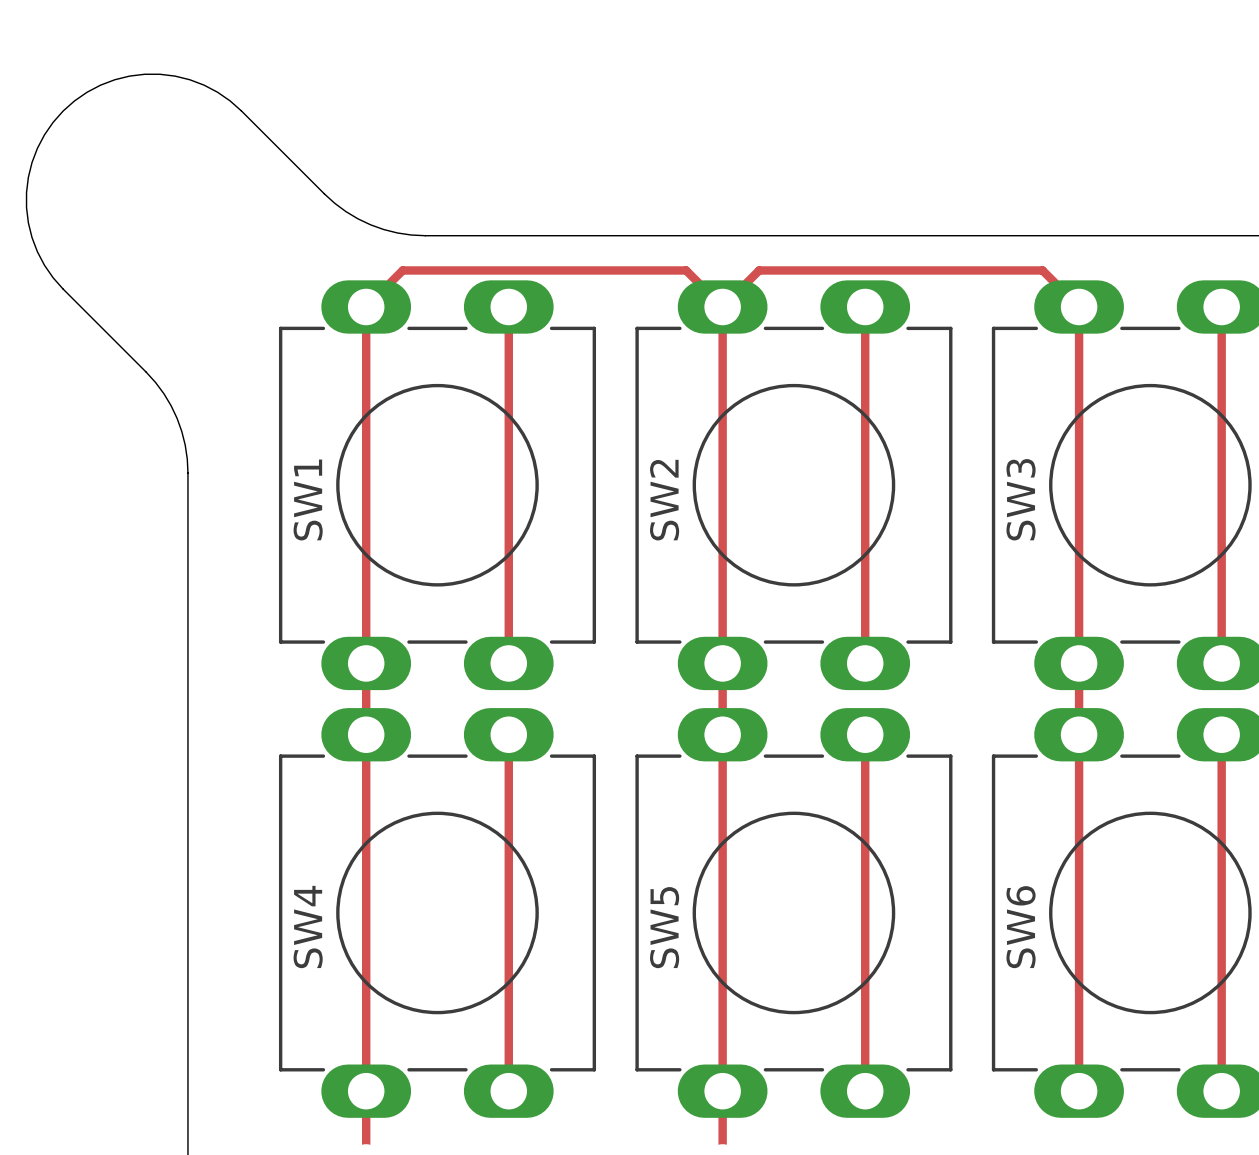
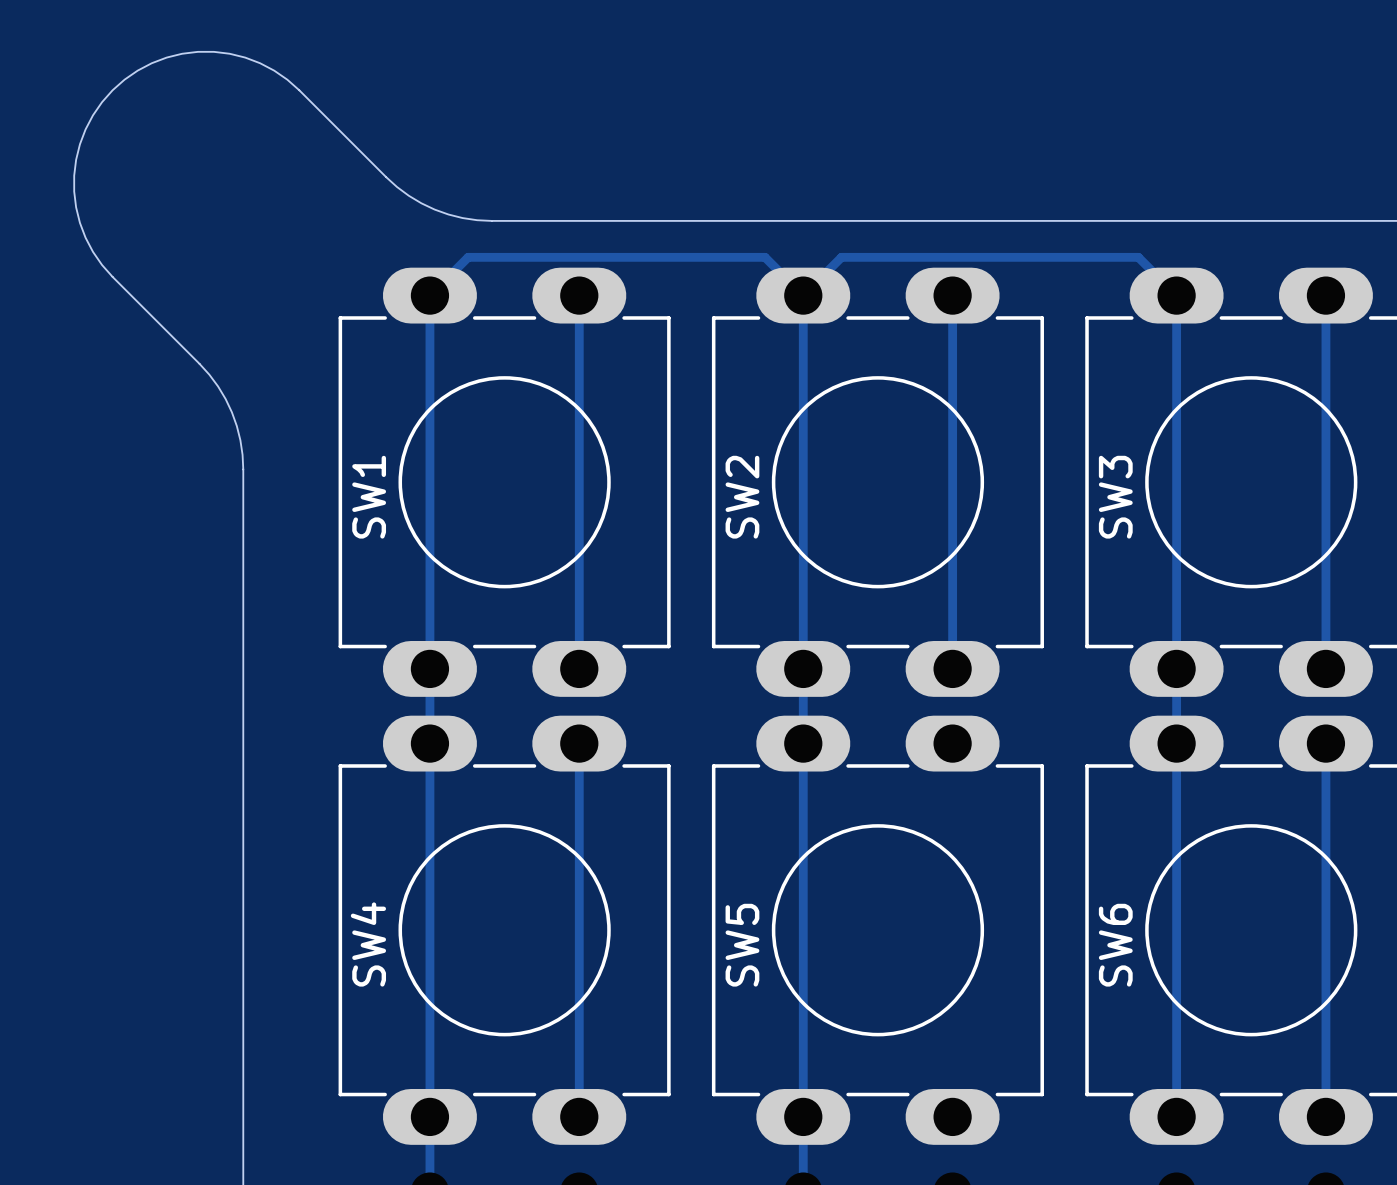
track: (865, 734) (865, 1091) -> none

